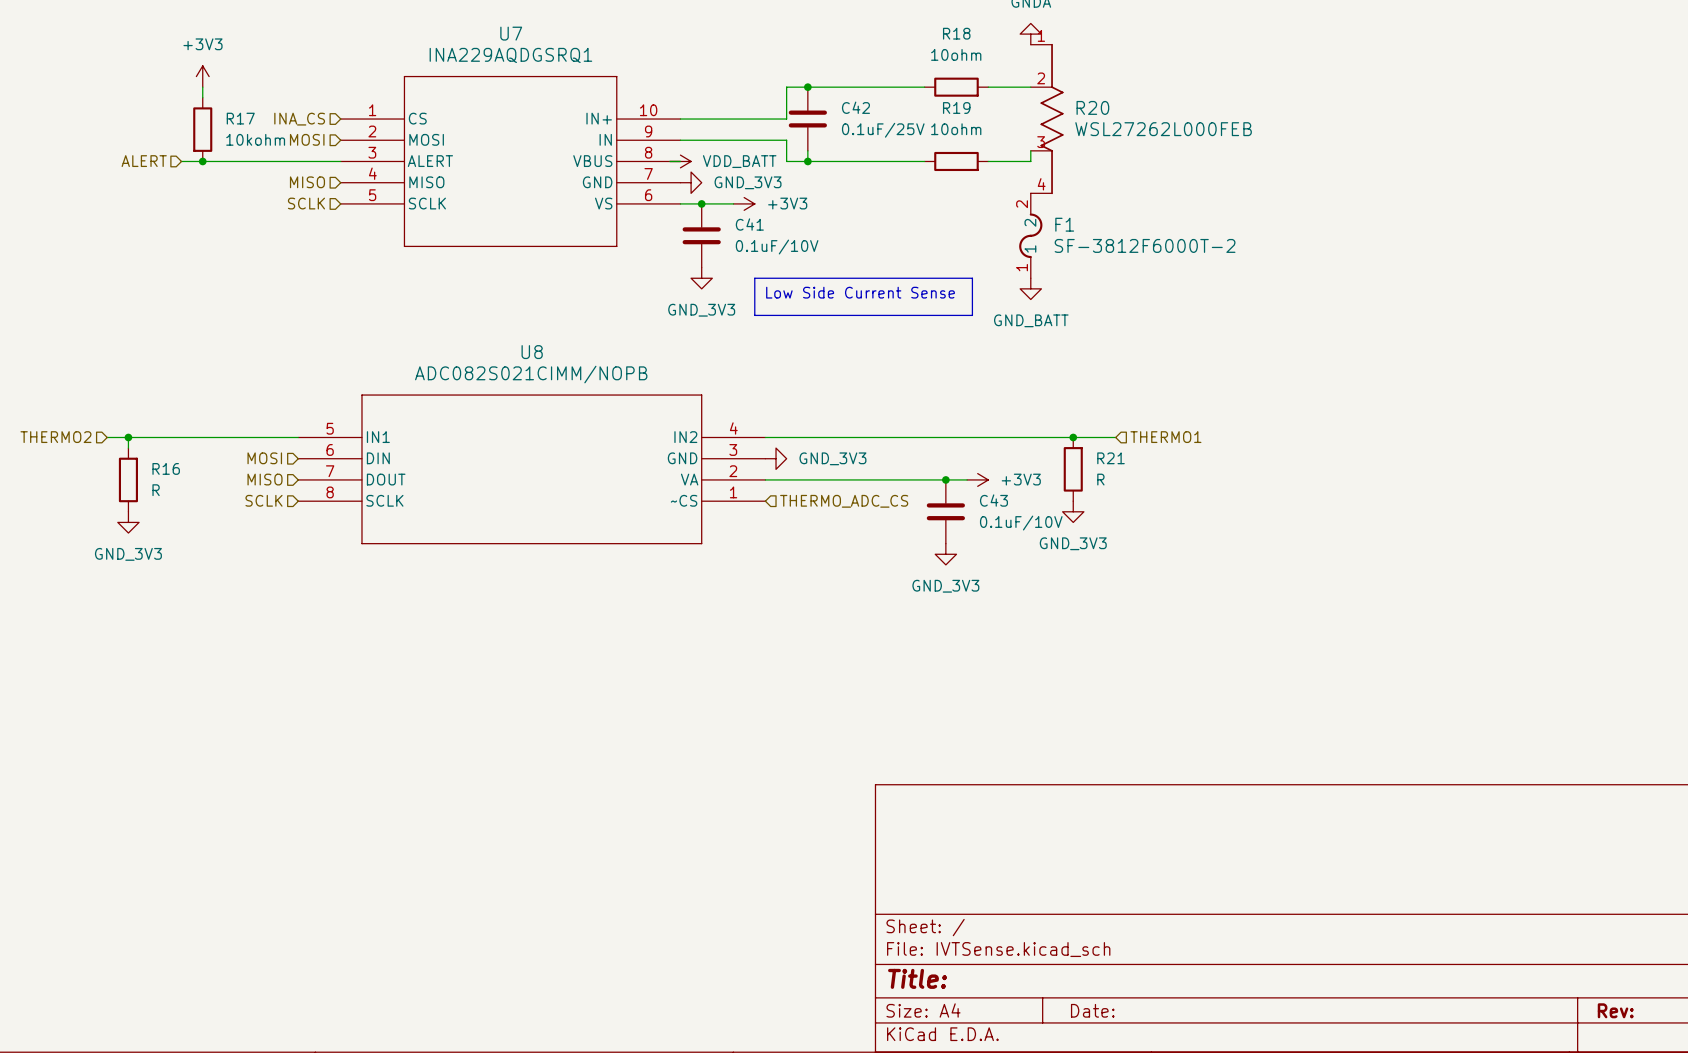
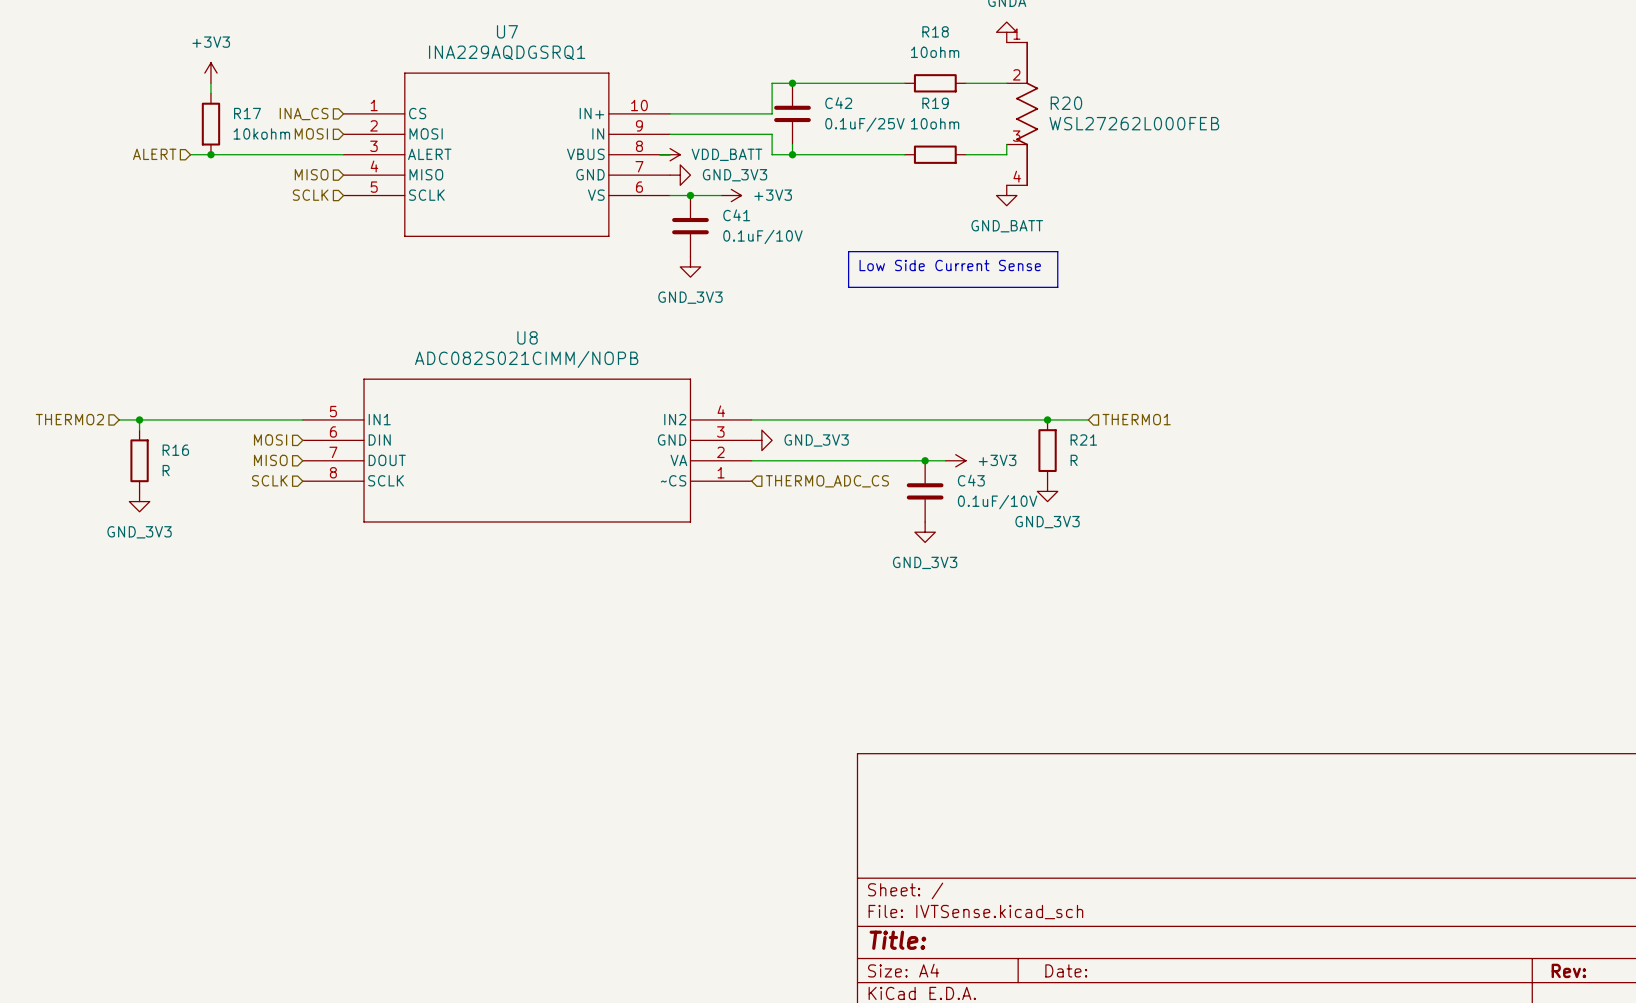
F1: SF-3812F6000T-2 (1030, 235) -> none
line: (754, 278) (972, 278) (972, 315) (754, 315) (754, 278) -> (848, 251) (1057, 251) (1057, 287) (848, 287) (848, 251)
power symbol position: GND_BATT (1030, 288) -> GND_BATT (1006, 195)
text position: Low Side Current Sense (860, 292) -> Low Side Current Sense (950, 265)

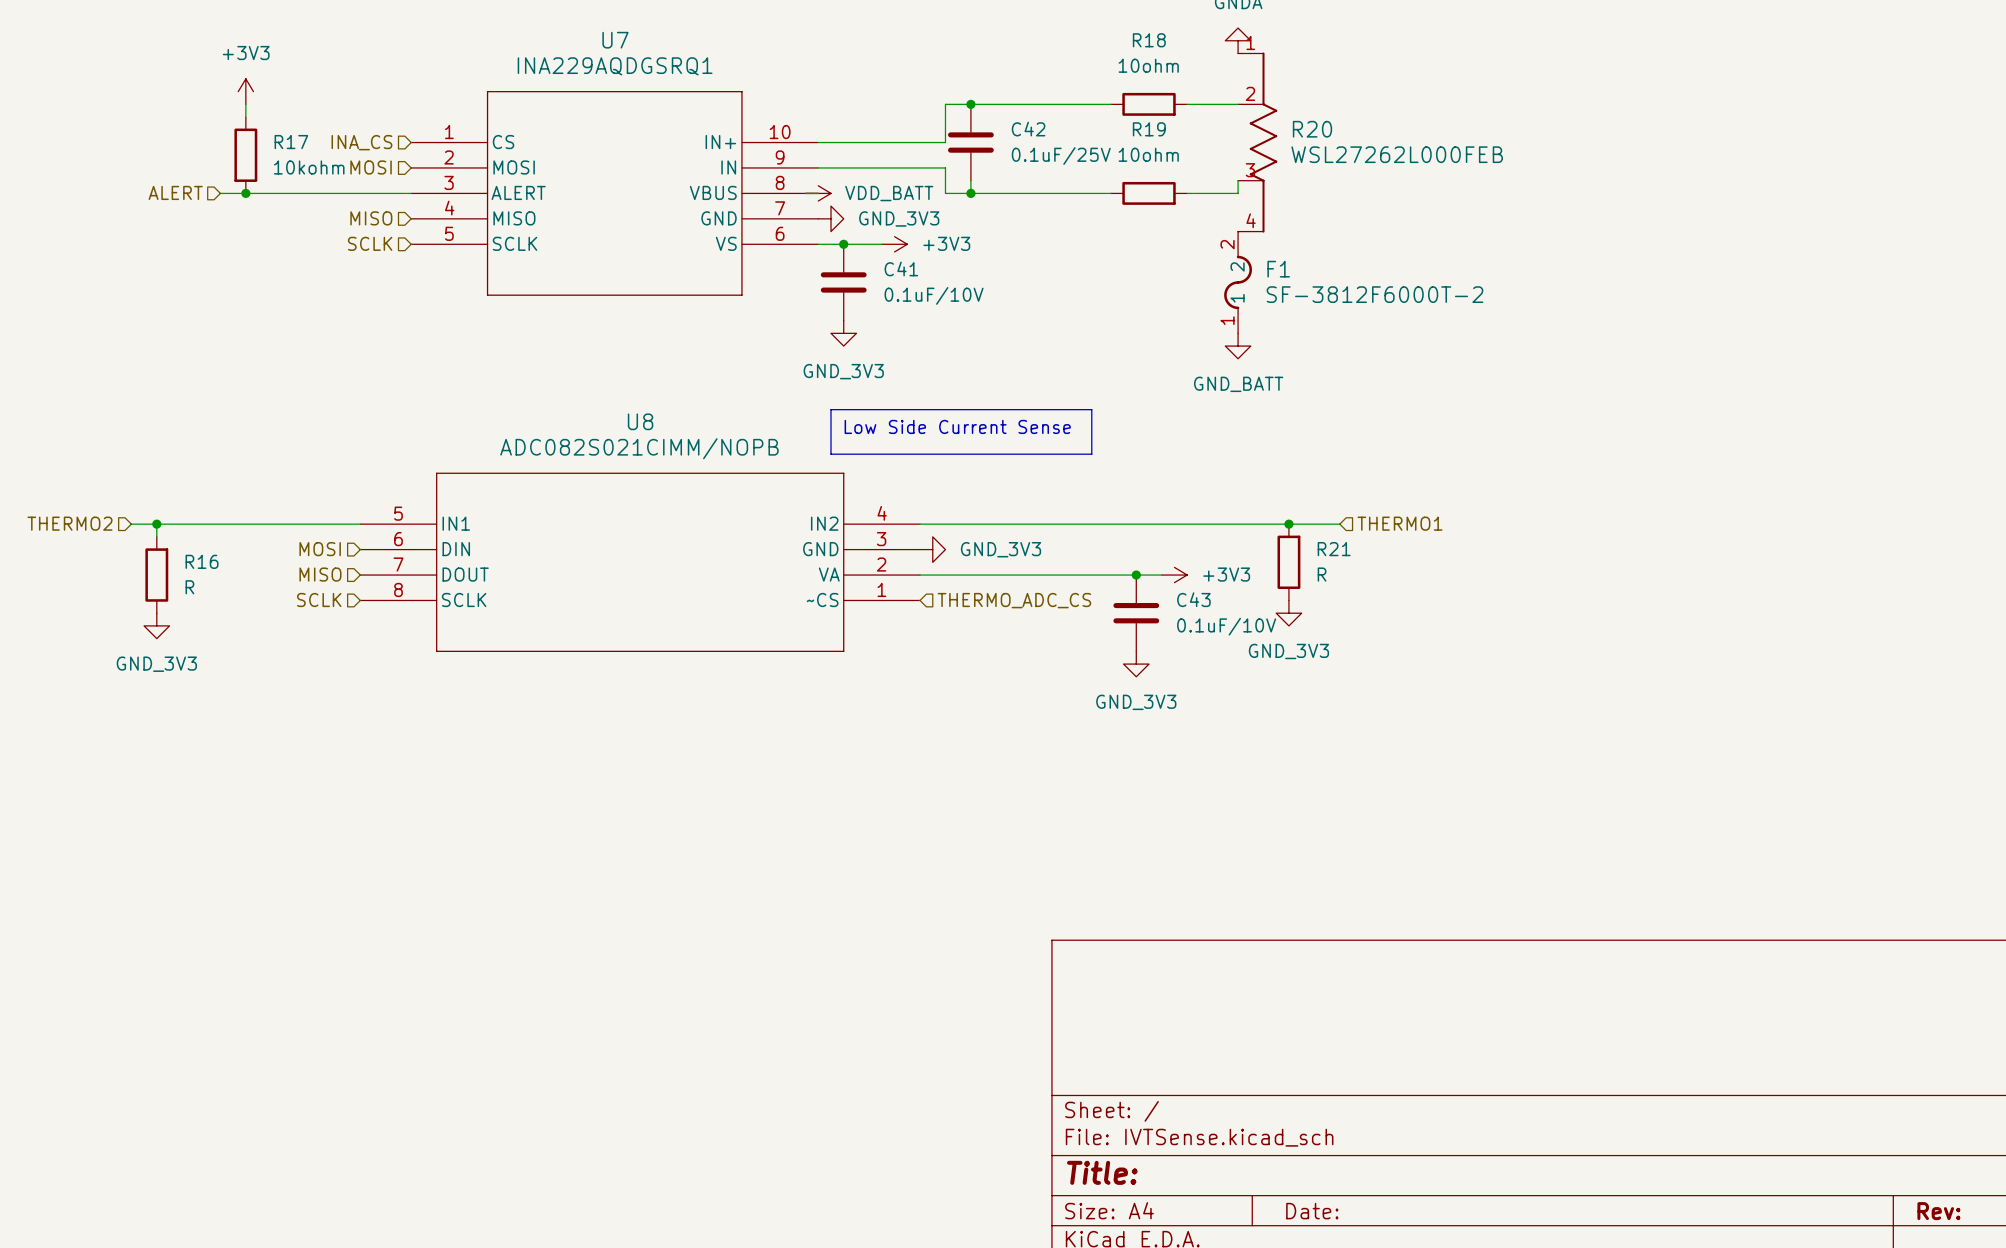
power symbol position: GND_BATT (1006, 195) -> GND_BATT (1238, 346)
F1: none -> SF-3812F6000T-2 (1238, 282)
line: (848, 251) (1057, 251) (1057, 287) (848, 287) (848, 251) -> (831, 409) (1091, 409) (1091, 454) (831, 454) (831, 409)
text position: Low Side Current Sense (950, 265) -> Low Side Current Sense (957, 426)

